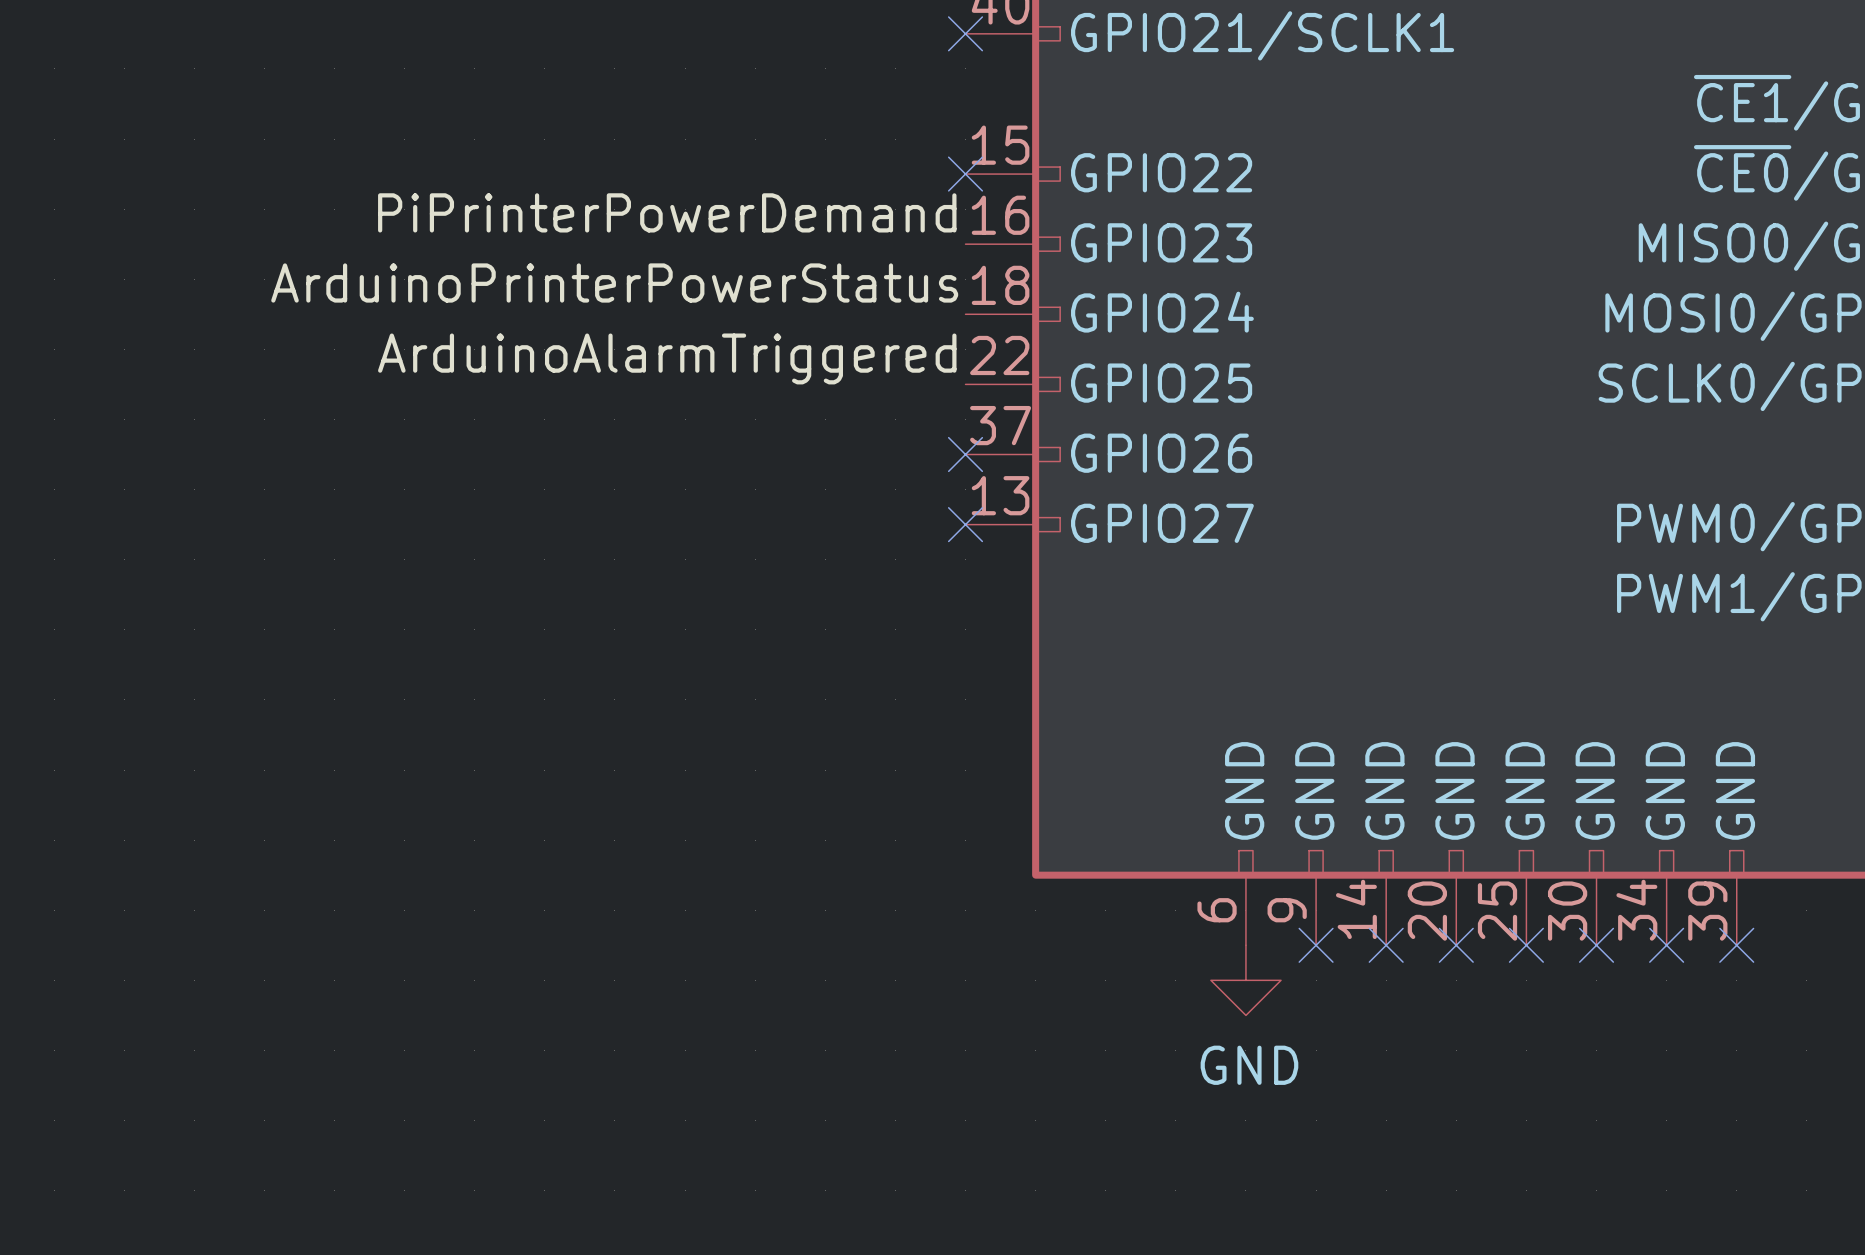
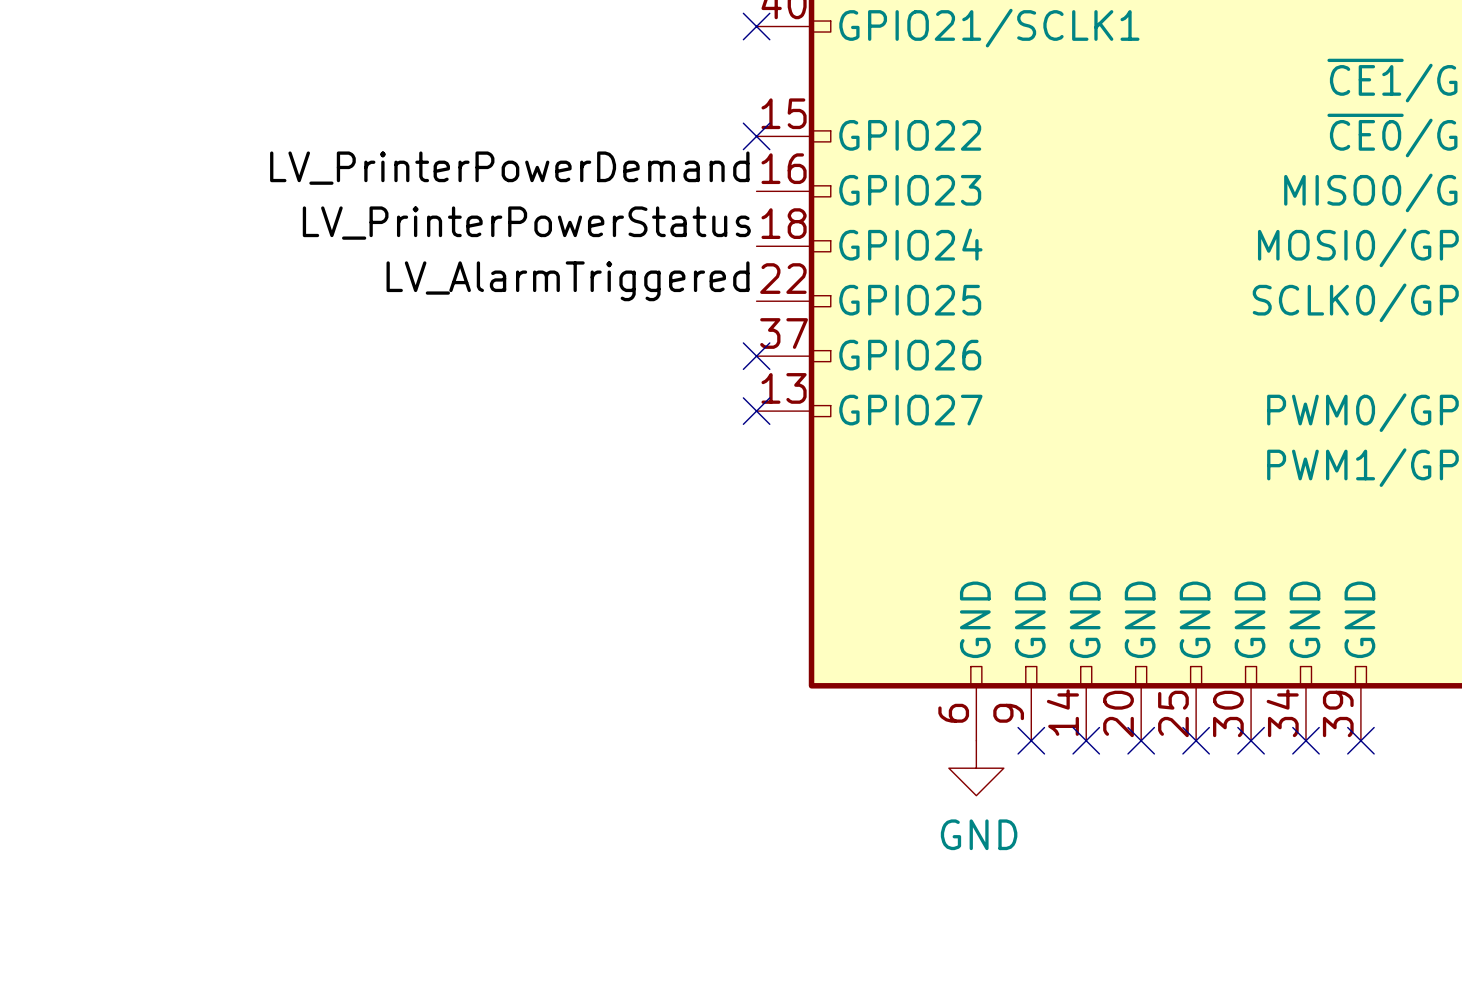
label: PiPrinterPowerDemand (667, 212) -> LV_PrinterPowerDemand (509, 168)
label: ArduinoPrinterPowerStatus (614, 283) -> LV_PrinterPowerStatus (526, 223)
label: ArduinoAlarmTriggered (667, 358) -> LV_AlarmTriggered (568, 281)

